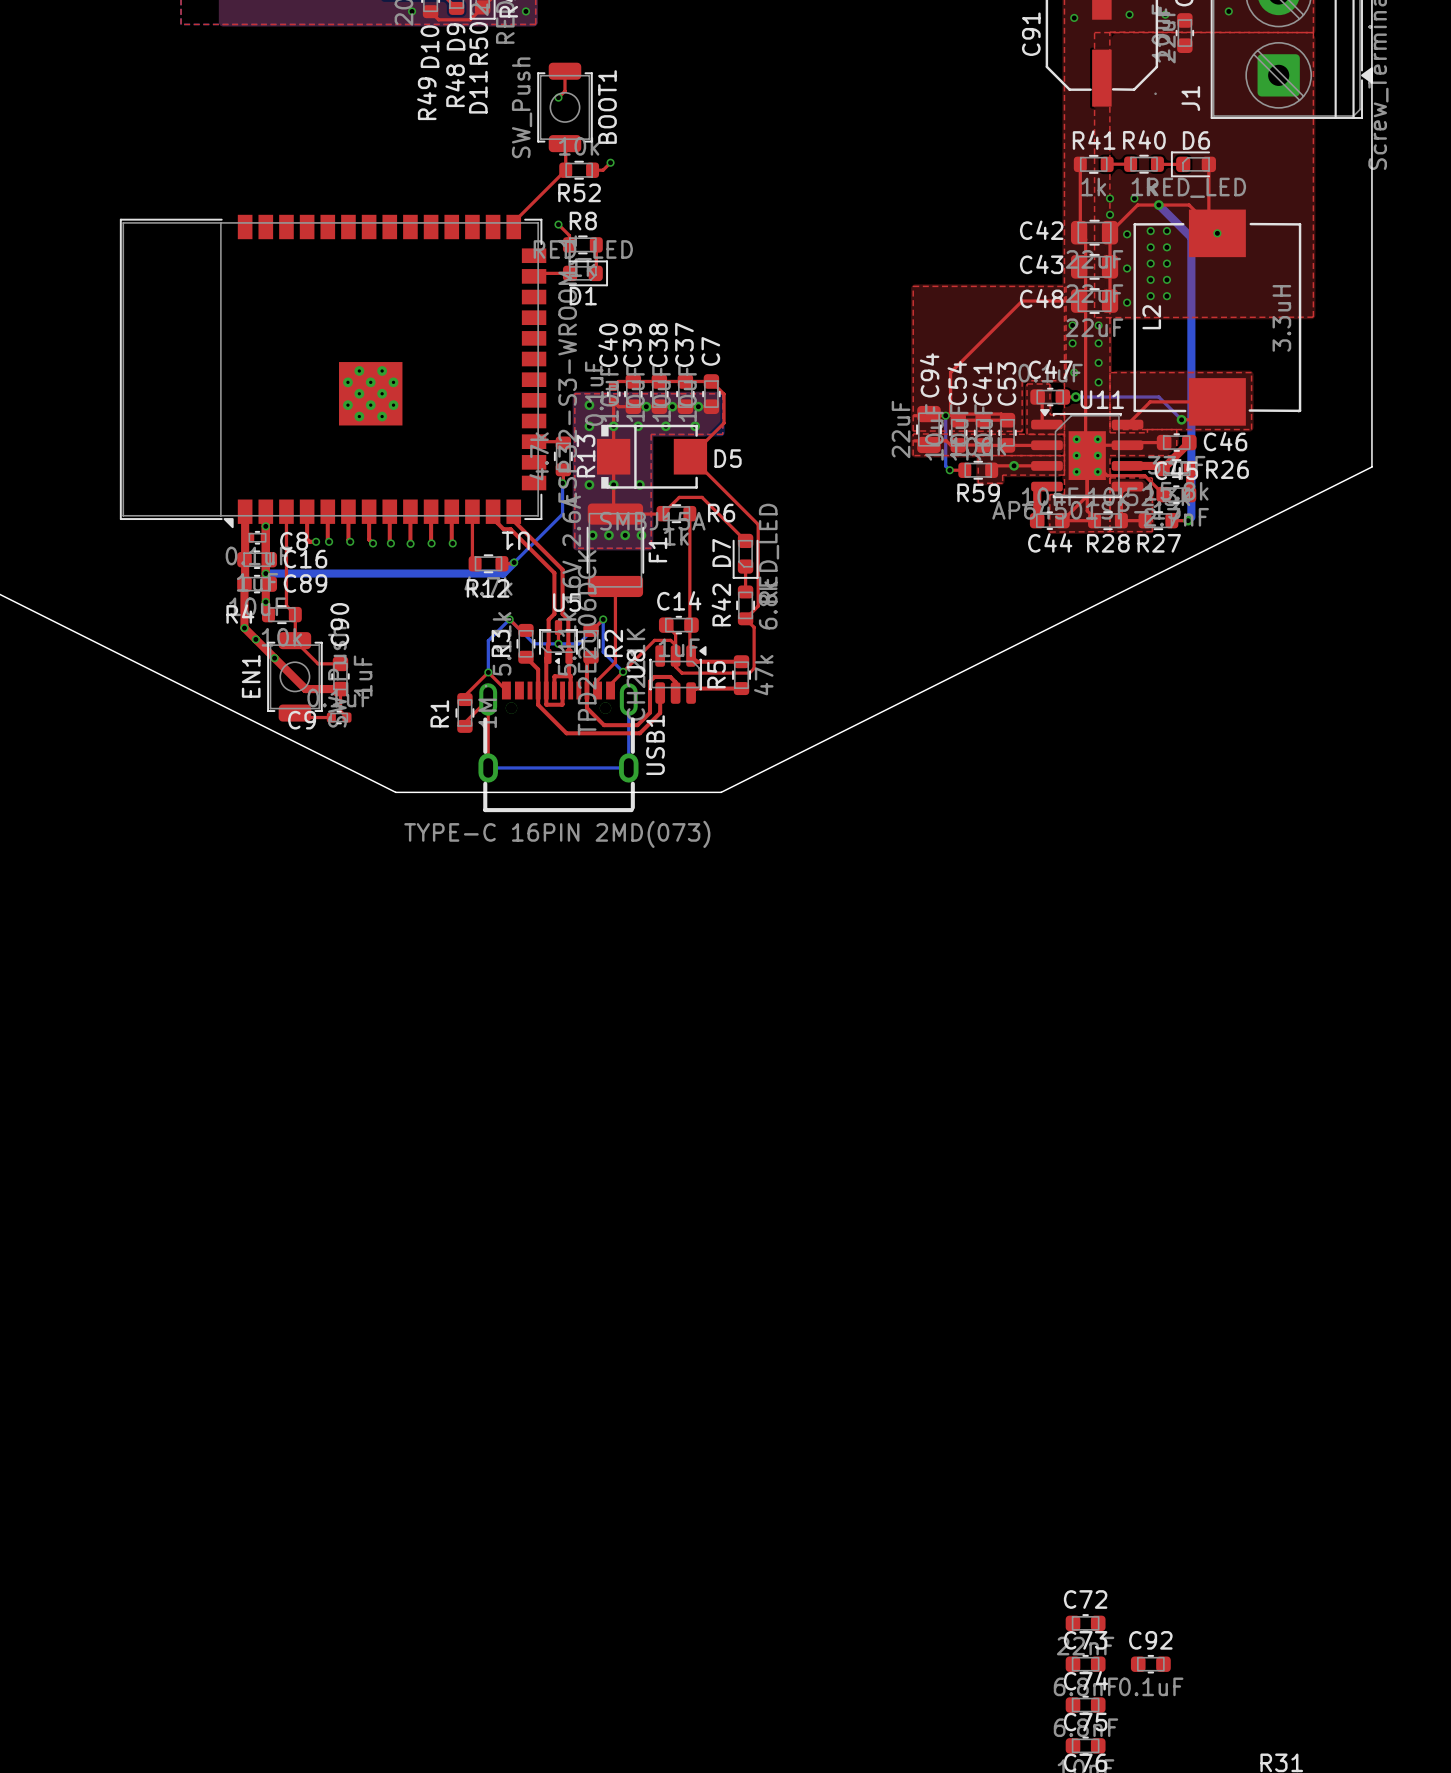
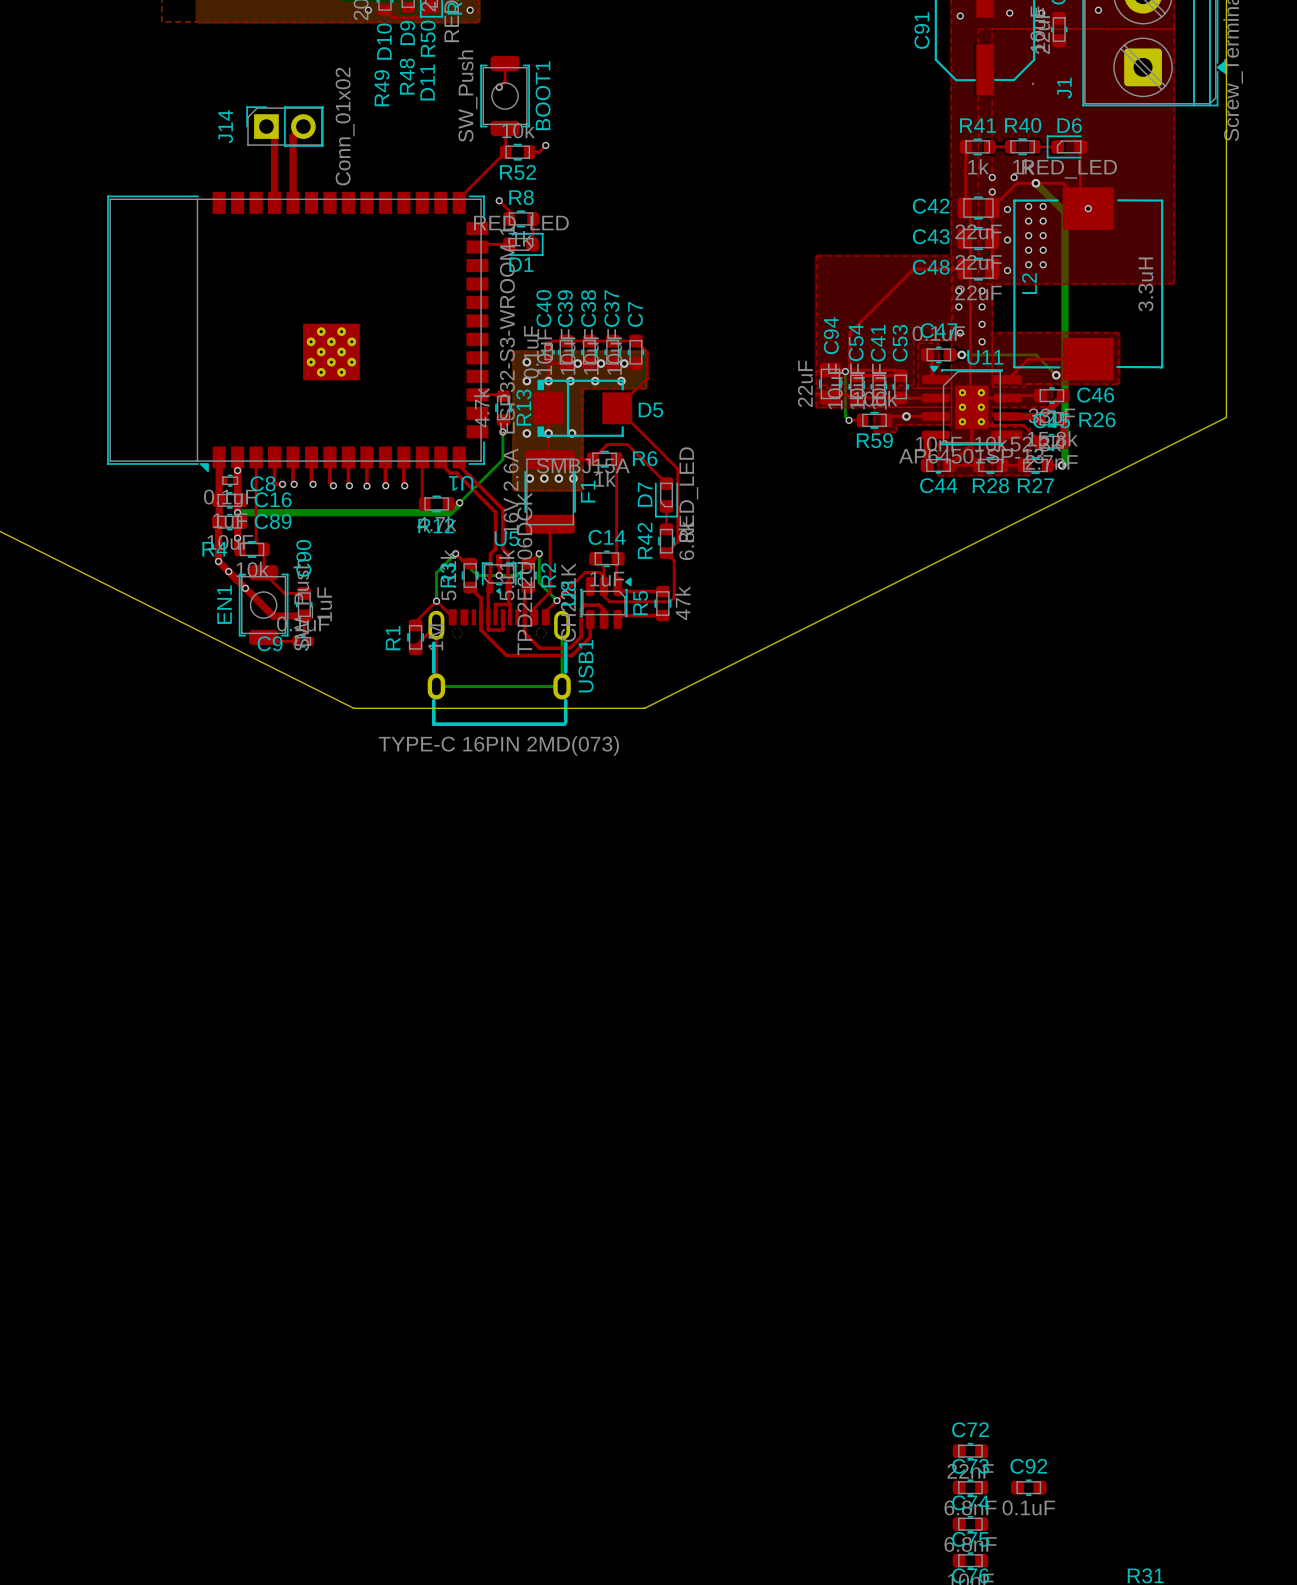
top track: none -> (266, 126) (274, 134) (274, 202)
J14: none -> Conn_01x02 (284, 126)
top track: none -> (303, 126) (293, 136) (293, 202)

